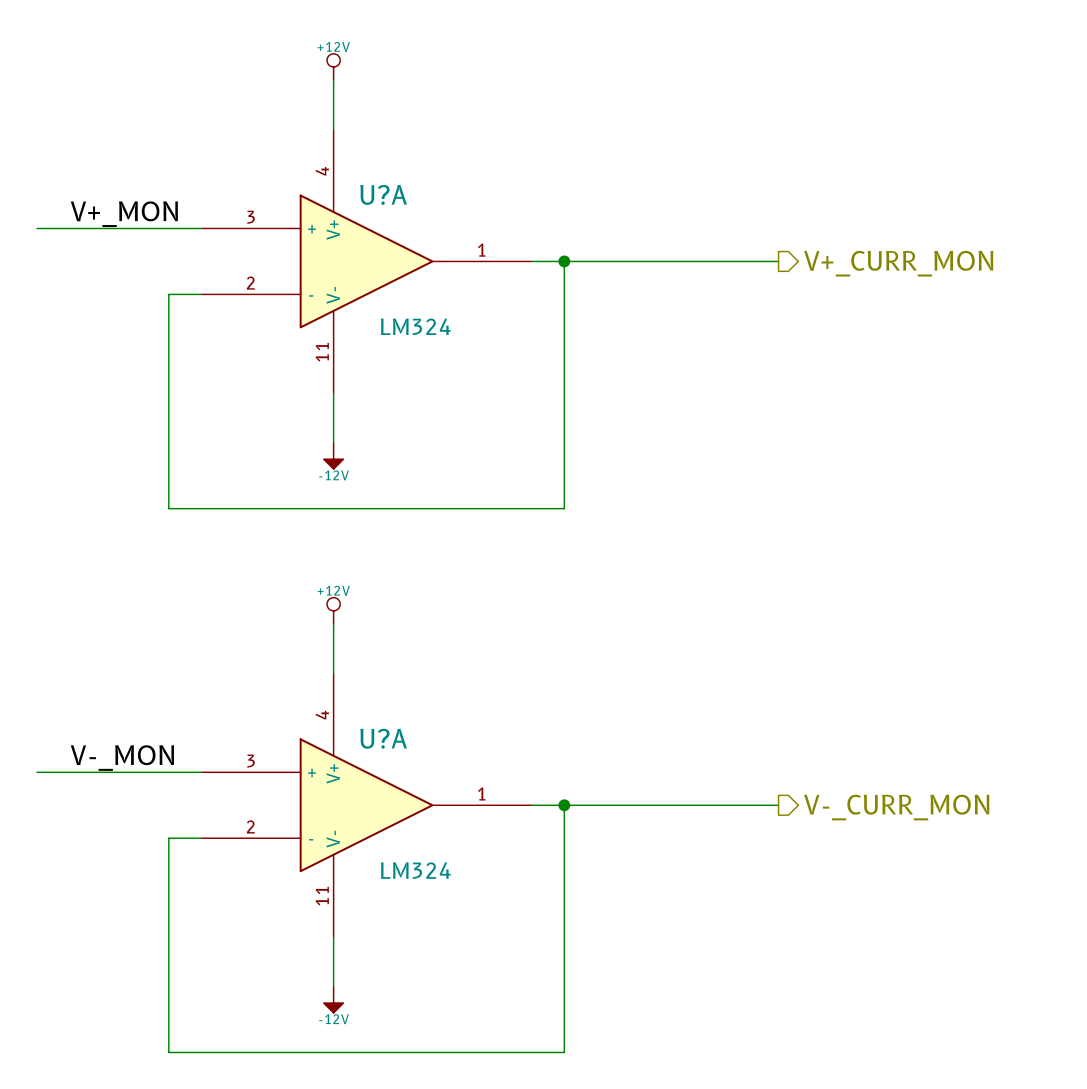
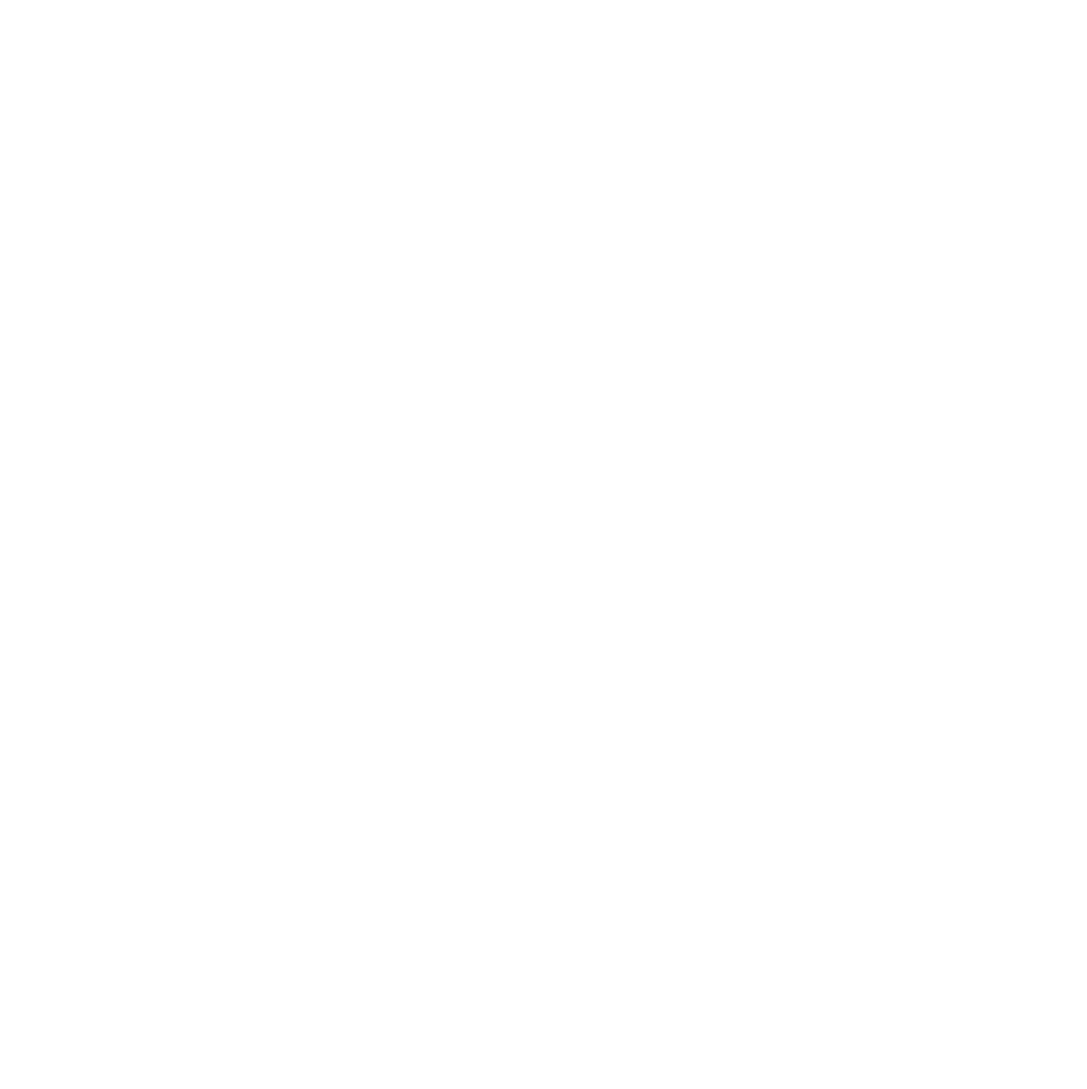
power symbol: +12V (333, 66) -> none
wire: (333, 80) (333, 129) -> none
label: V+_MON (124, 214) -> none
wire: (36, 228) (201, 228) -> none
U?A: LM324 (366, 261) -> none
wire: (531, 261) (778, 261) -> none
wire: (564, 261) (564, 508) (168, 508) (168, 294) (201, 294) -> none
junction: (564, 261) -> none
hierarchical label: V+_CURR_MON (898, 263) -> none
wire: (333, 393) (333, 442) -> none
power symbol: -12V (333, 455) -> none
power symbol: +12V (333, 610) -> none
wire: (333, 624) (333, 673) -> none
label: V-_MON (122, 758) -> none
wire: (36, 772) (201, 772) -> none
U?A: LM324 (366, 805) -> none
wire: (531, 805) (778, 805) -> none
wire: (564, 805) (564, 1052) (168, 1052) (168, 838) (201, 838) -> none
junction: (564, 805) -> none
hierarchical label: V-_CURR_MON (896, 807) -> none
wire: (333, 937) (333, 986) -> none
power symbol: -12V (333, 999) -> none

